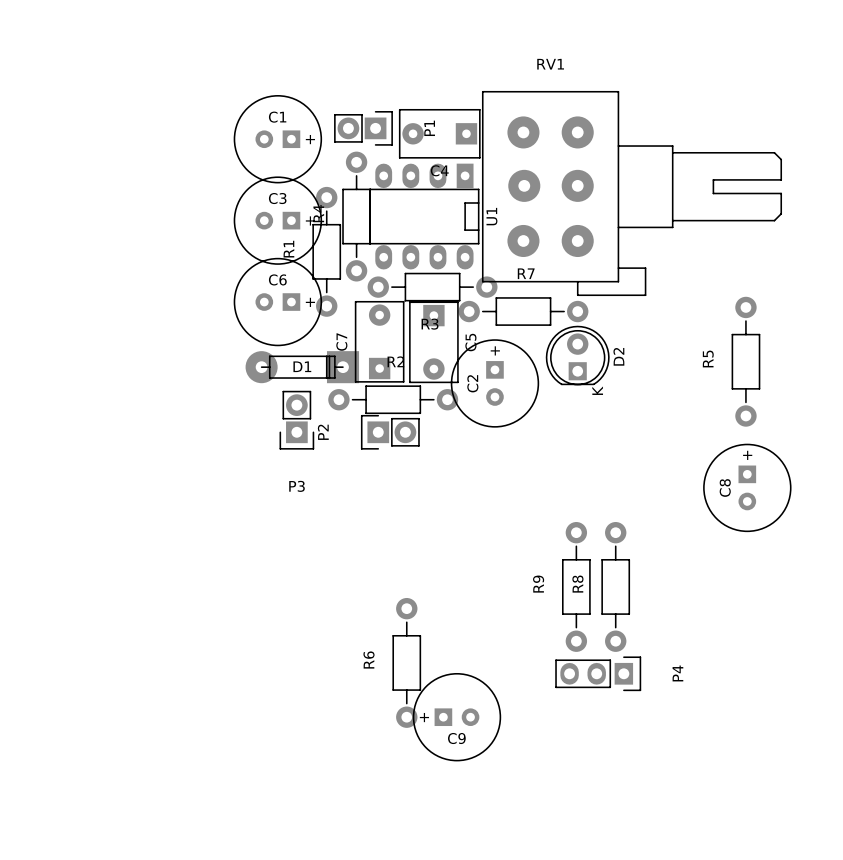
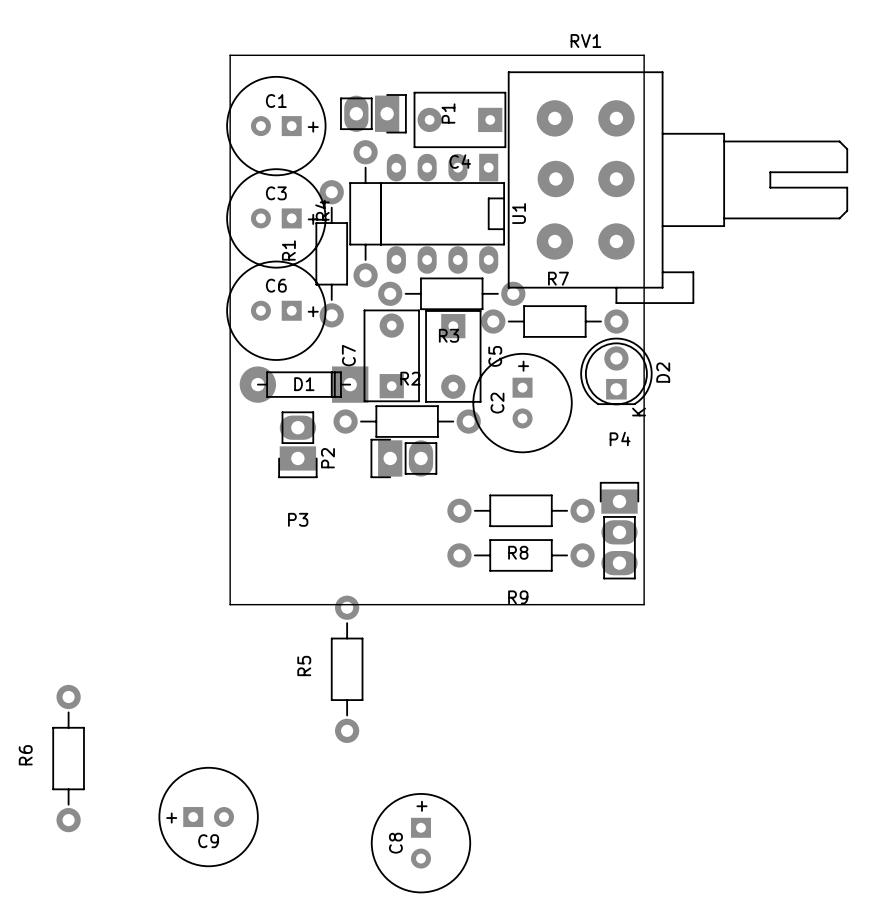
board edge: none -> (230, 55) (644, 55) (644, 604) (230, 604) (230, 55)
P1 footprint: [334, 111, 393, 146] -> [340, 94, 407, 134]
R5 position: (745, 361) -> (347, 669)
P3 footprint: [279, 390, 315, 450] -> [278, 411, 318, 479]
P2 footprint: [360, 414, 420, 450] -> [370, 438, 438, 479]
C8 position: (747, 487) -> (420, 843)
R9 name position: R9 (538, 584) -> R9 (518, 597)
R8 name position: R8 (577, 584) -> R8 (518, 552)
R9 rotation: 0° (576, 586) -> 90° clockwise (521, 555)
R9 position: (576, 586) -> (521, 555)
R8 rotation: 0° (615, 586) -> 90° clockwise (521, 510)
R8 position: (615, 586) -> (521, 510)
P4 footprint: [555, 656, 642, 692] -> [599, 481, 640, 580]
R6 position: (406, 662) -> (68, 758)
P4 name position: P4 (677, 673) -> P4 (620, 439)
C9 position: (456, 717) -> (208, 817)

